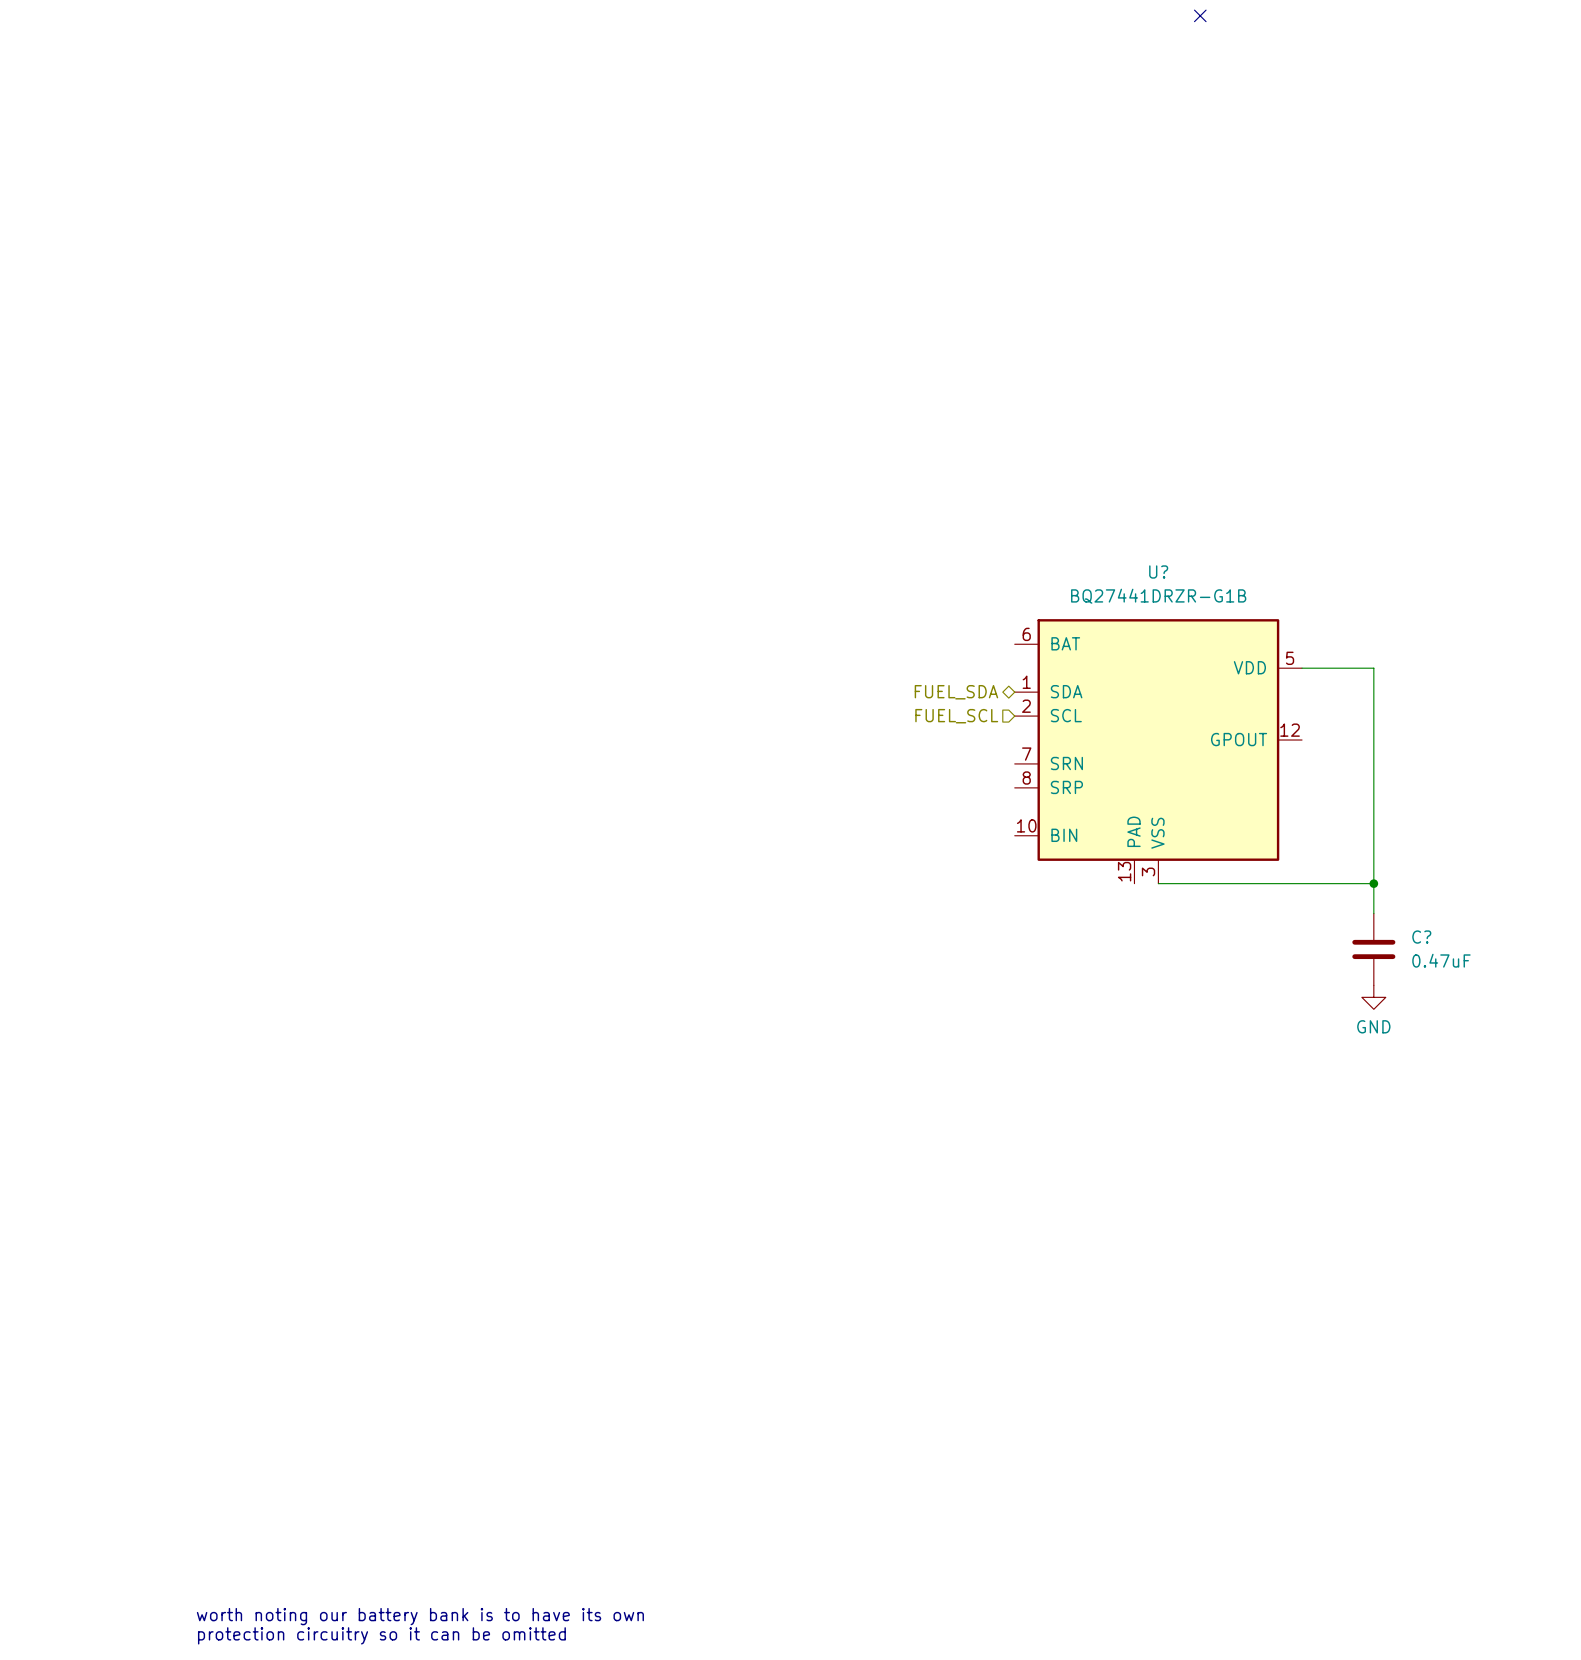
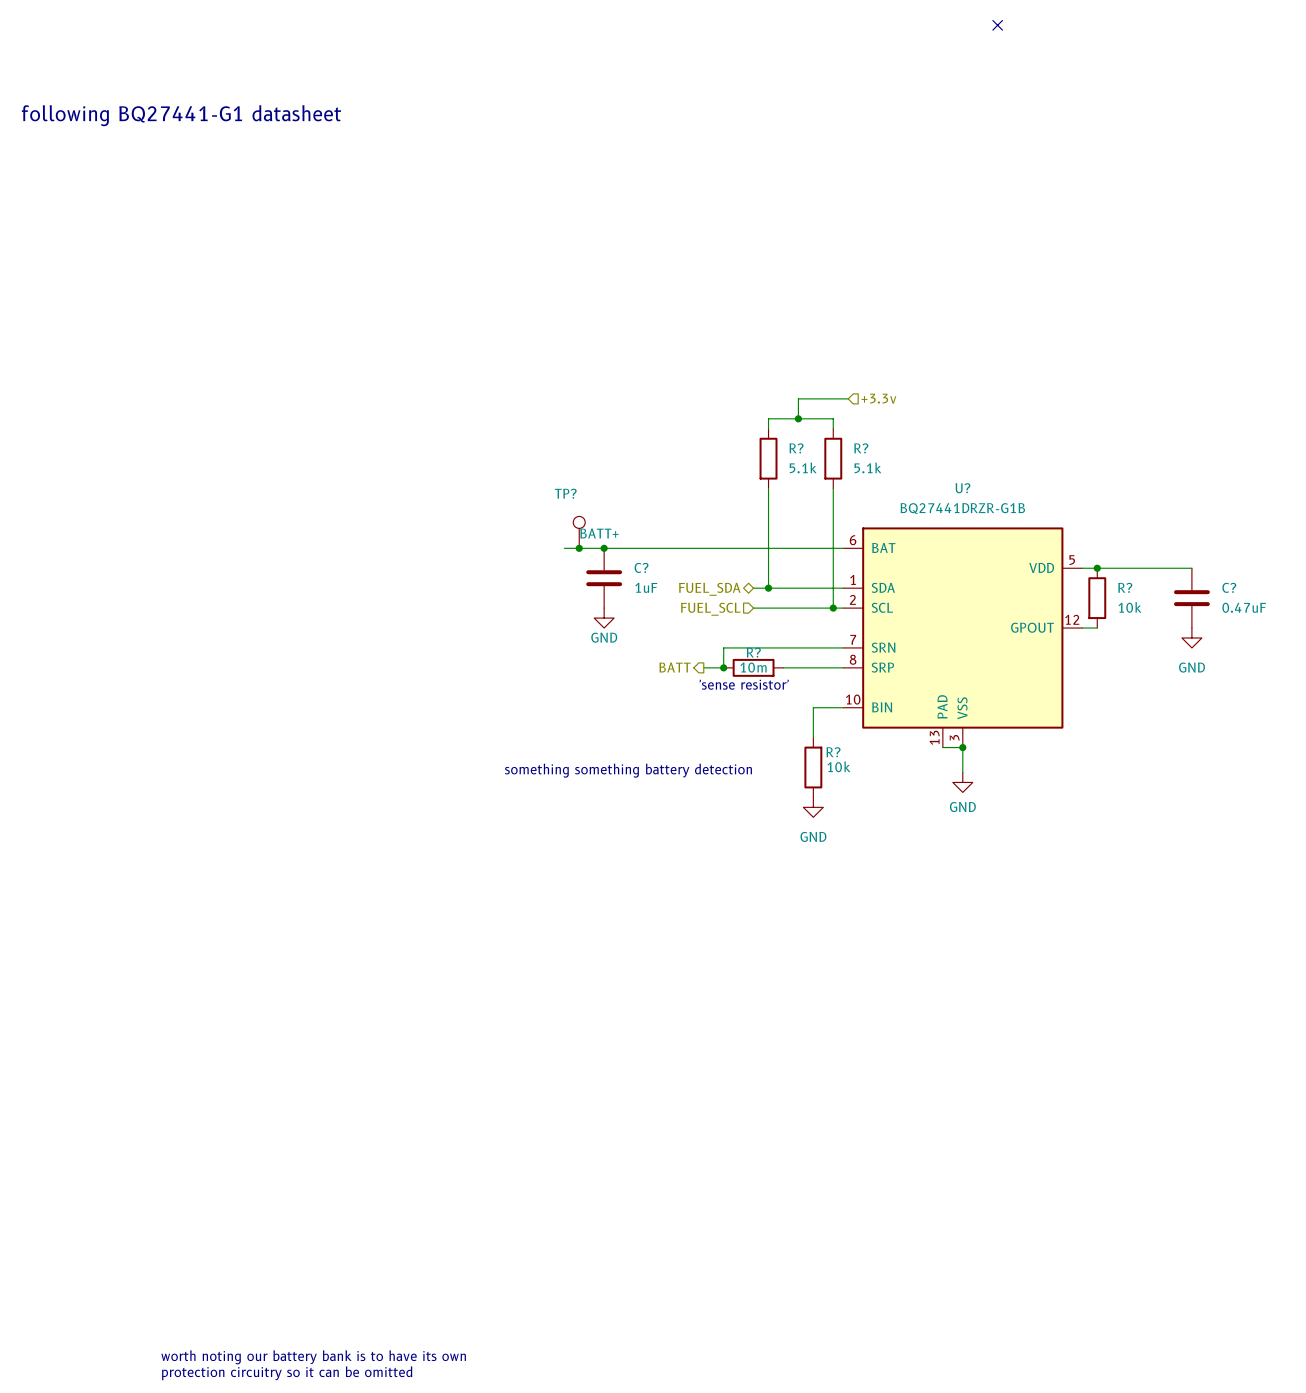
text: none -> following BQ27441-G1 datasheet (181, 115)
wire: none -> (848, 398) (798, 398) (798, 418)
hierarchical label: none -> +3.3v (878, 398)
junction: none -> (798, 418)
wire: none -> (768, 428) (768, 418) (833, 418) (833, 428)
R?: none -> 5.1k (768, 458)
R?: none -> 5.1k (833, 458)
wire: none -> (768, 488) (768, 588)
wire: none -> (833, 488) (833, 608)
TP?: none -> BATT+ (579, 532)
wire: none -> (564, 548) (843, 548)
junction: none -> (579, 548)
junction: none -> (604, 548)
junction: none -> (1097, 568)
wire: (1373, 668) (1373, 913) -> (1142, 568) (1191, 568)
C?: none -> 1uF (604, 578)
wire: none -> (753, 588) (843, 588)
junction: none -> (768, 588)
hierarchical label position: FUEL_SDA (956, 692) -> FUEL_SDA (709, 589)
R?: none -> 10k (1097, 598)
C?: none -> 0.47uF (1191, 598)
wire: none -> (753, 608) (843, 608)
hierarchical label position: FUEL_SCL (956, 716) -> FUEL_SCL (710, 609)
junction: none -> (833, 608)
power symbol: none -> GND (604, 618)
wire: none -> (1082, 628) (1097, 628)
power symbol: none -> GND (1191, 637)
wire: none -> (843, 647) (723, 647) (723, 667) (703, 667)
hierarchical label: none -> BATT (674, 667)
junction: none -> (723, 667)
R?: none -> 10m (753, 667)
wire: none -> (783, 667) (843, 667)
text: none -> 'sense resistor' (744, 684)
wire: none -> (843, 707) (813, 707) (813, 737)
wire: none -> (942, 747) (962, 747) (962, 772)
wire: (1158, 883) (1373, 883) -> none
junction: none -> (962, 747)
junction: (1373, 883) -> none
R?: none -> 10k (813, 767)
text: none -> something something battery detection (628, 770)
power symbol: none -> GND (962, 782)
C?: 0.47uF (1373, 949) -> none
power symbol: none -> GND (813, 807)
power symbol: GND (1373, 997) -> none

